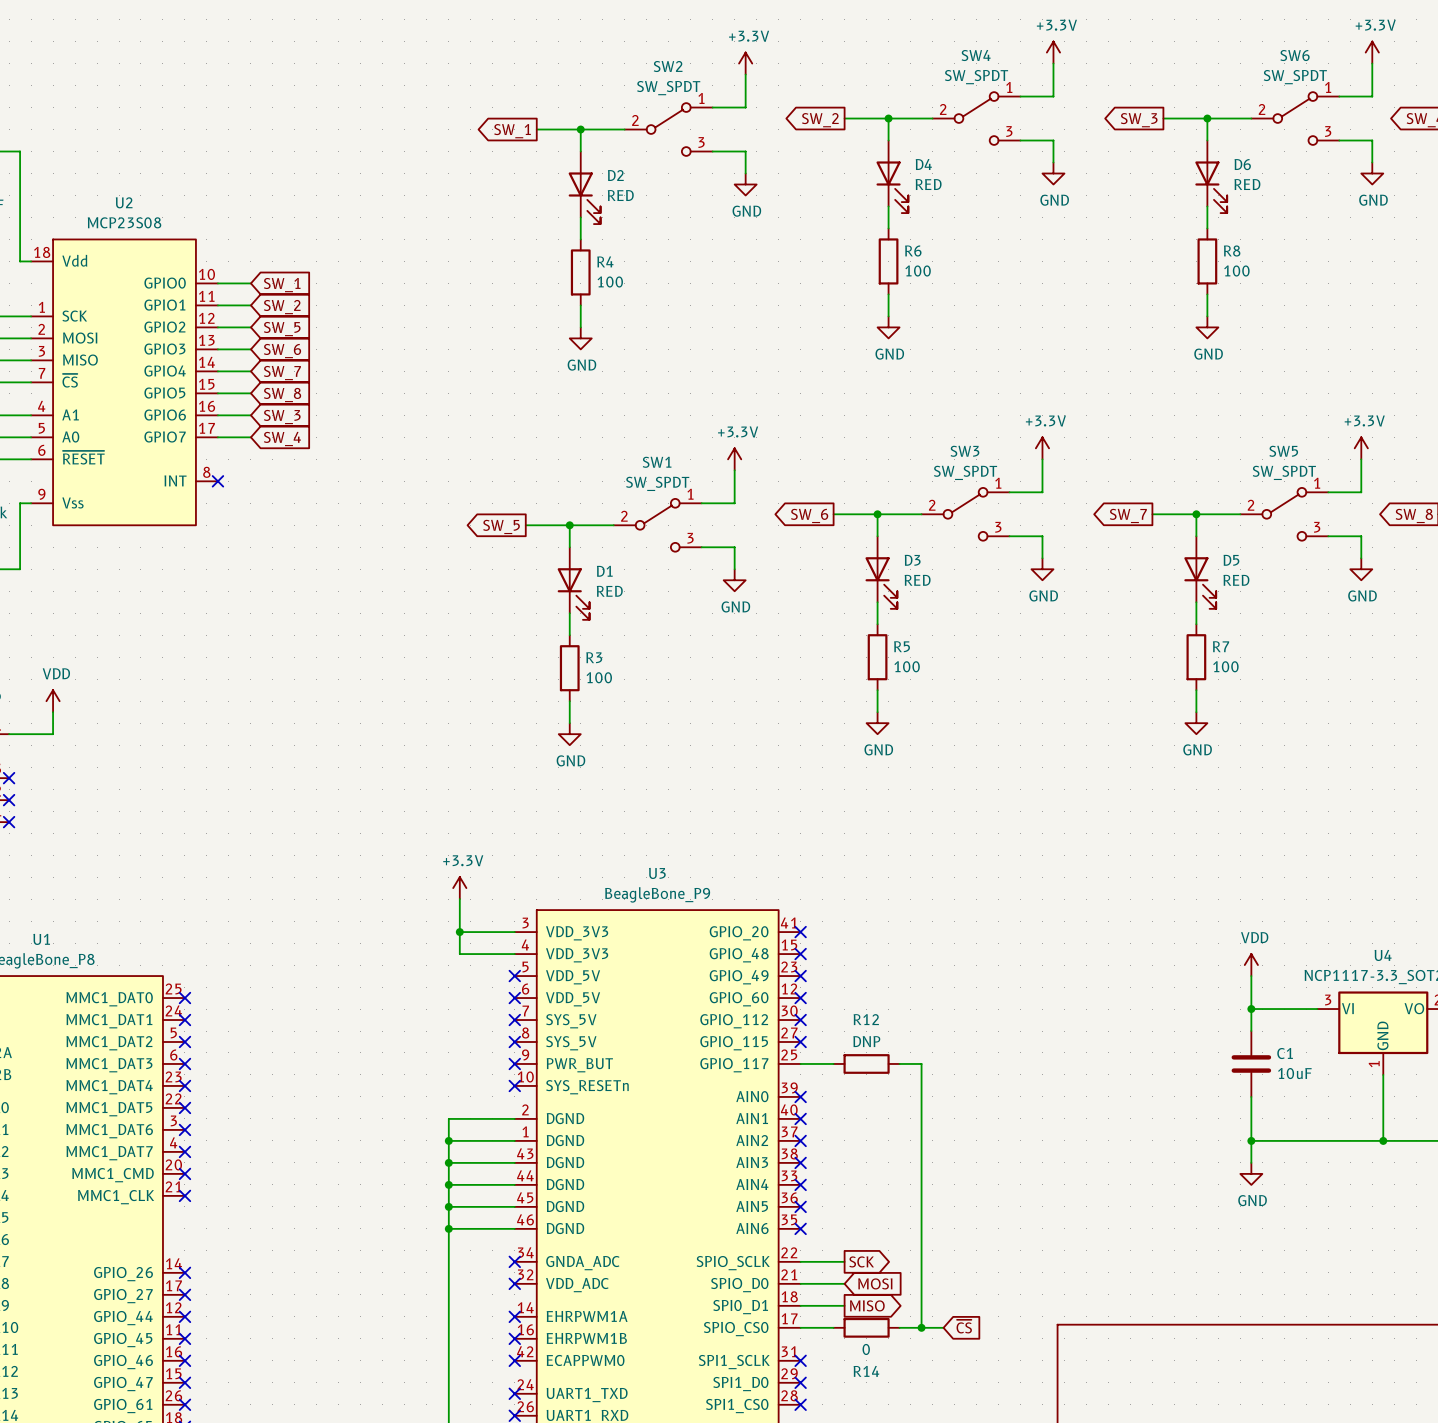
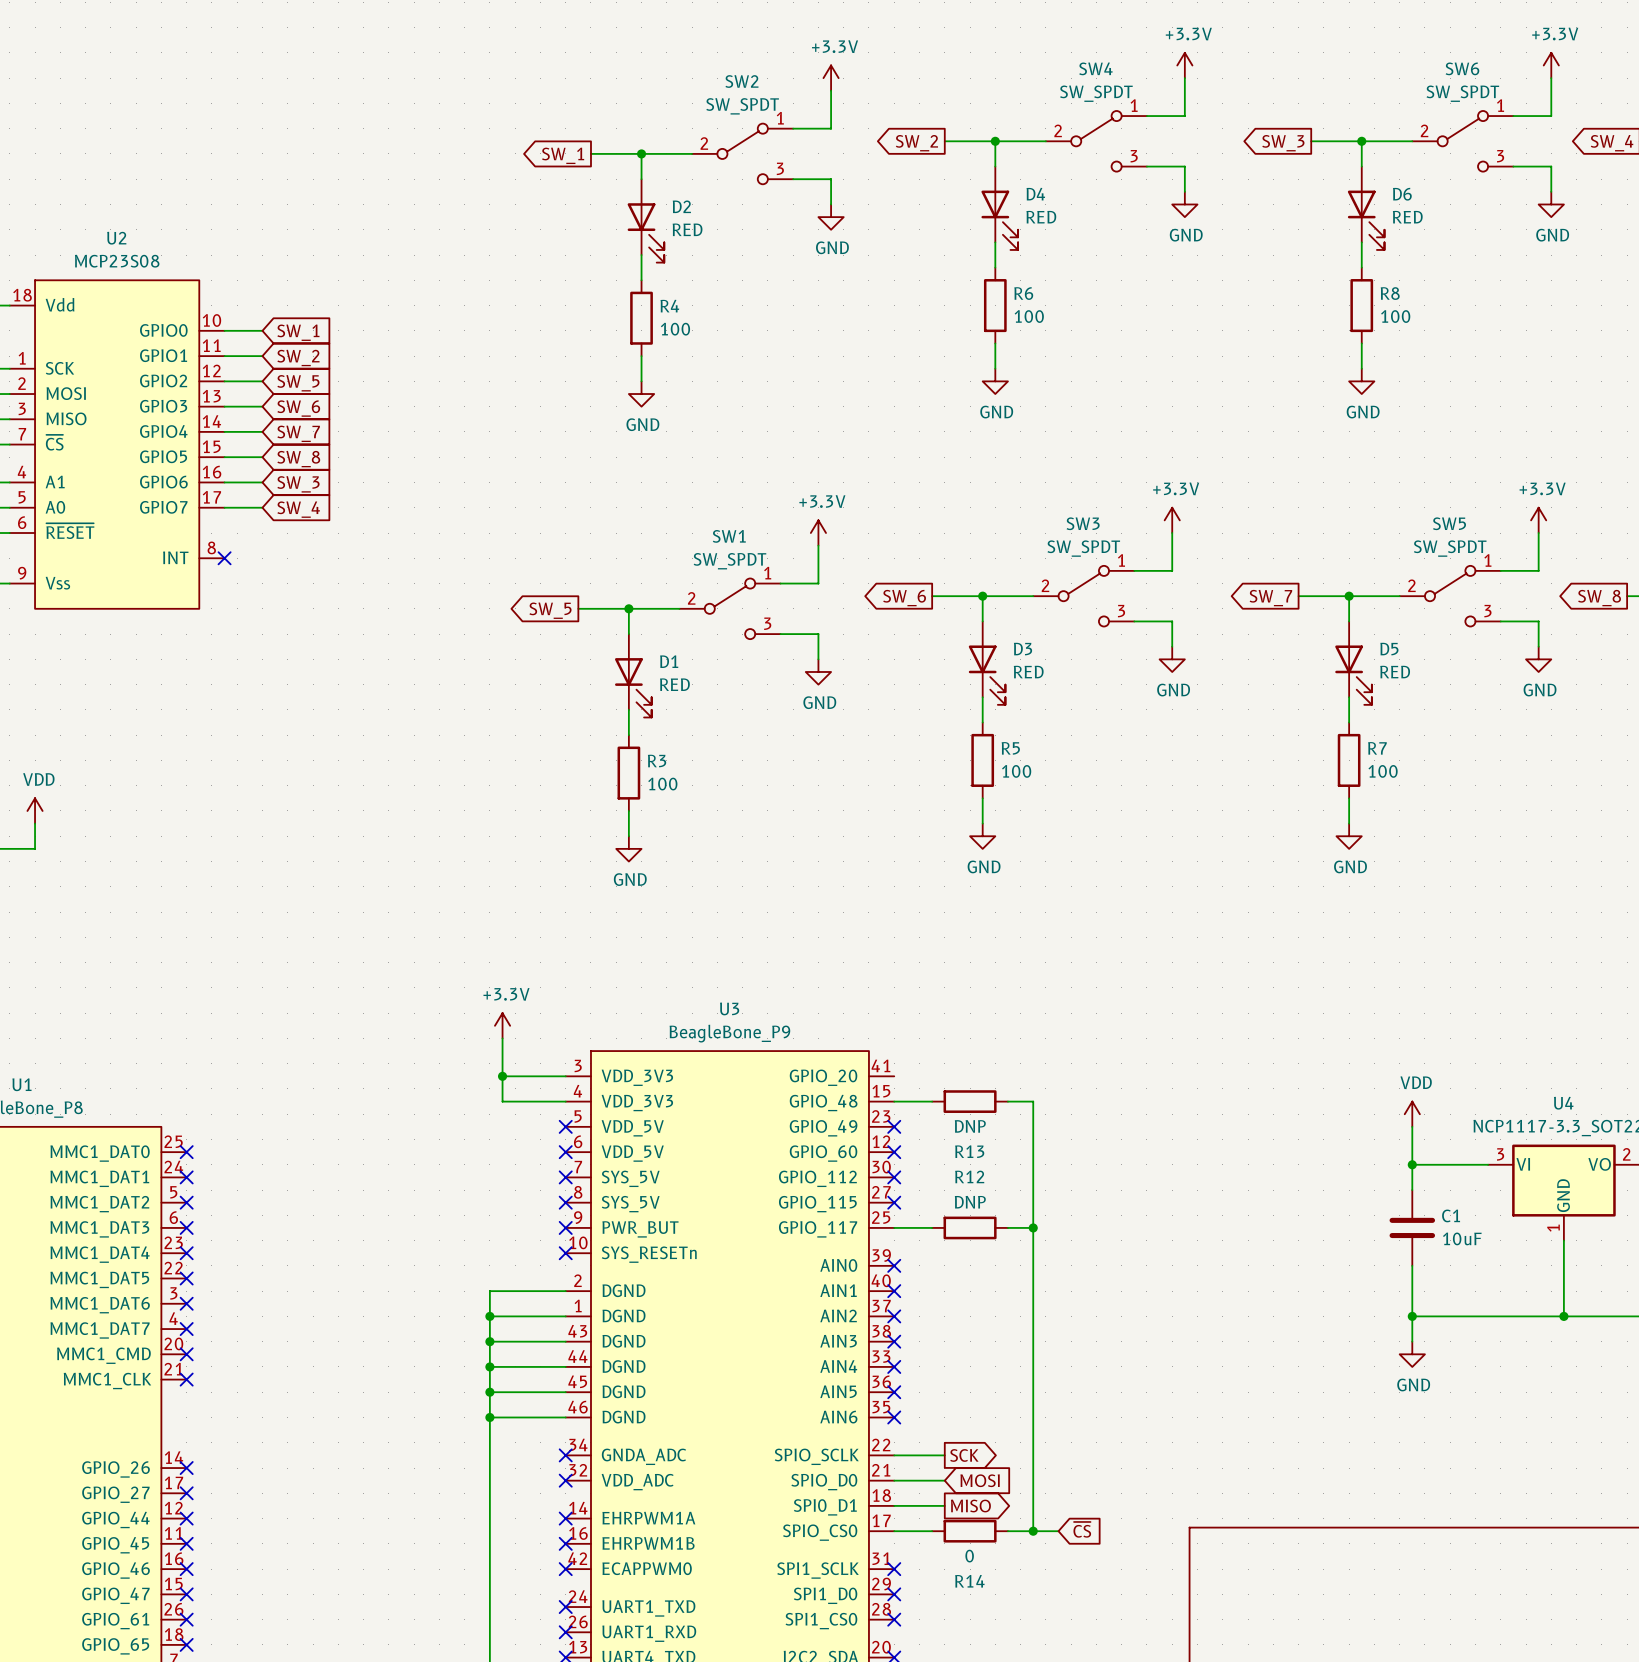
no-connect mark: (800, 932) -> none
wire: none -> (894, 1101) (932, 1101)
no-connect mark: (800, 954) -> none
R13: none -> DNP (970, 1101)
wire: none -> (1007, 1101) (1033, 1101) (1033, 1227)
junction: none -> (1033, 1227)

